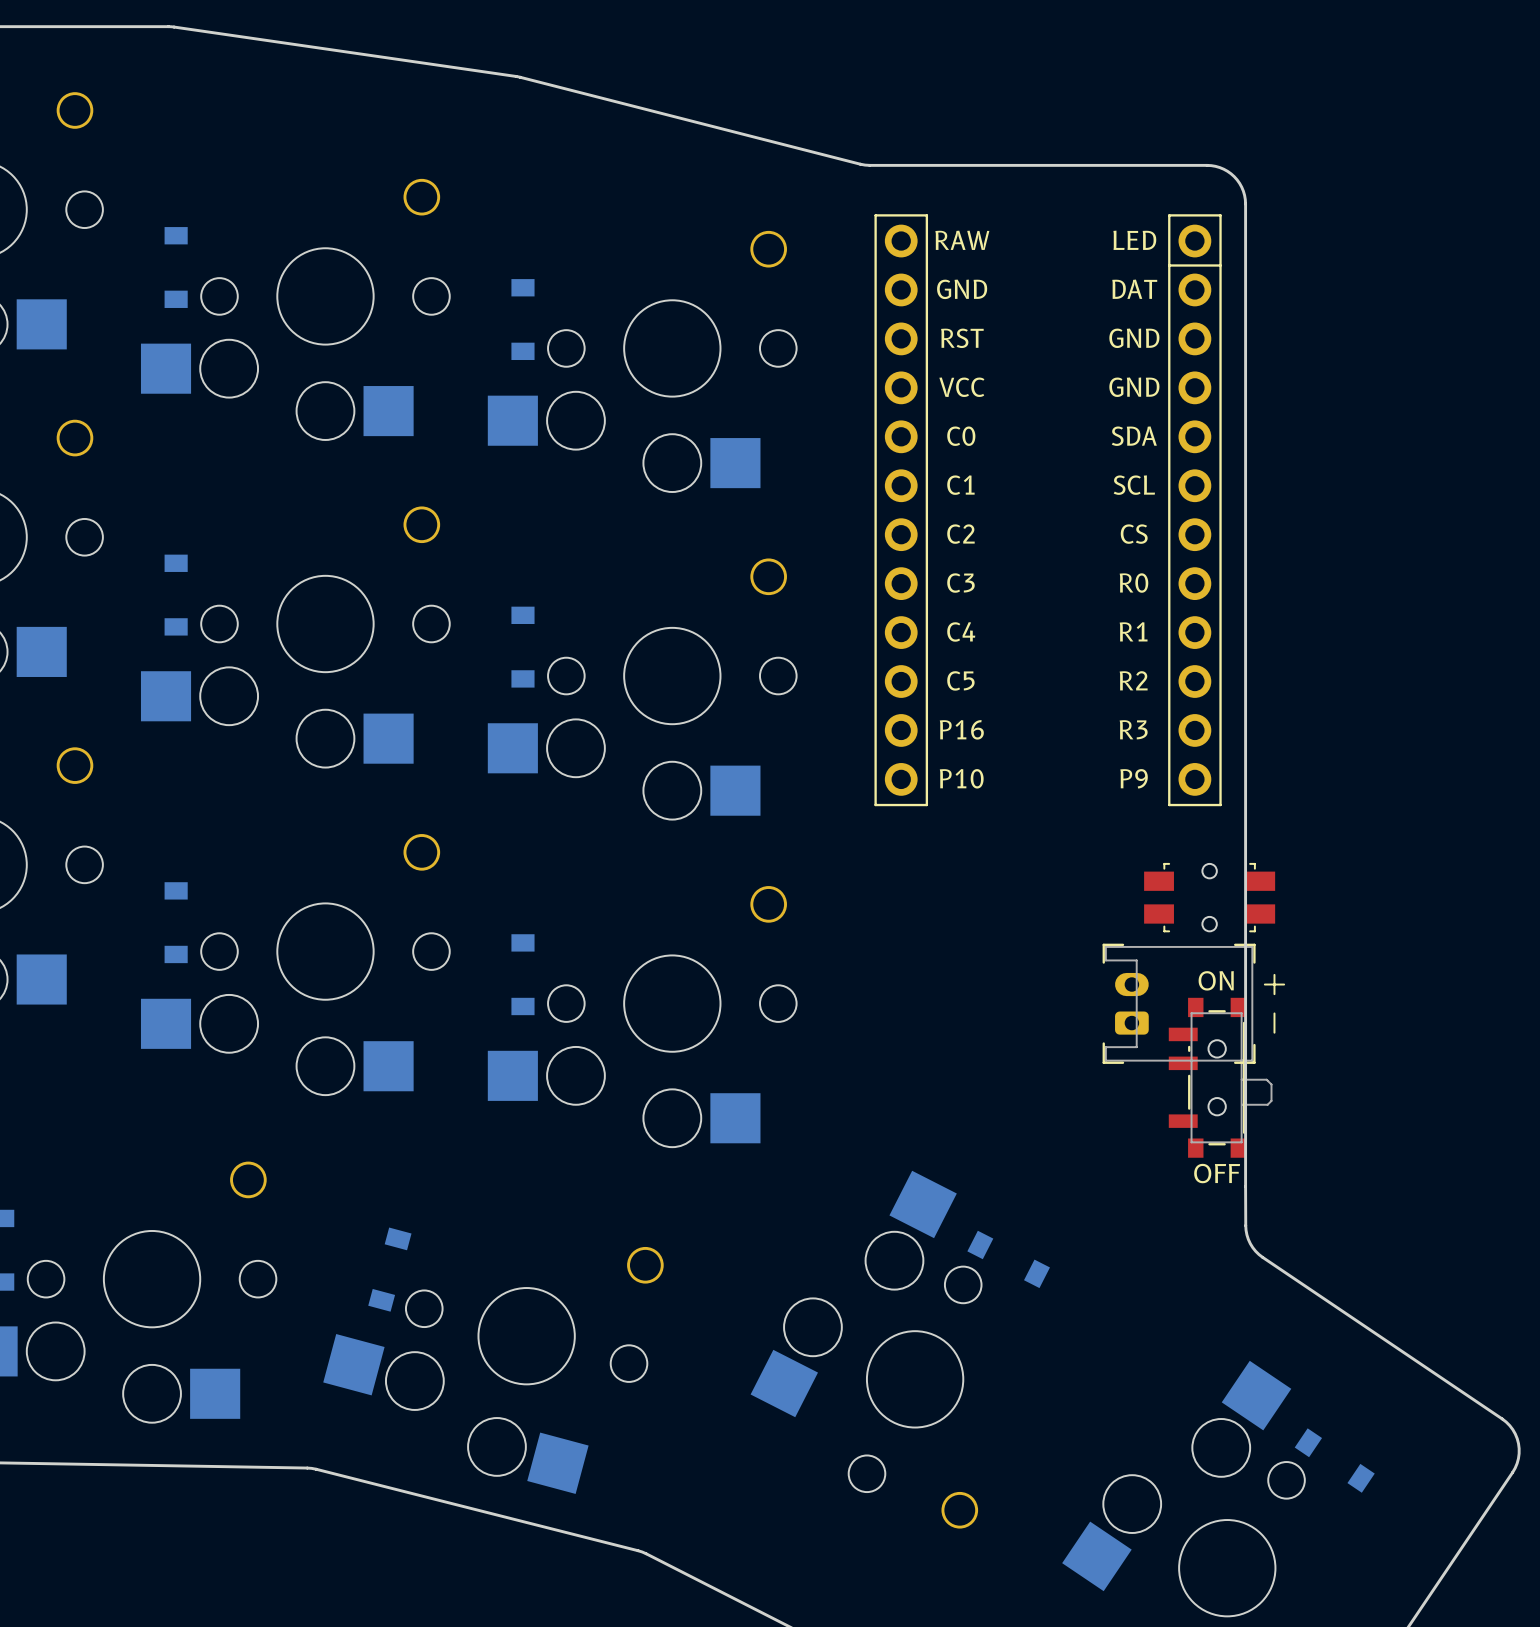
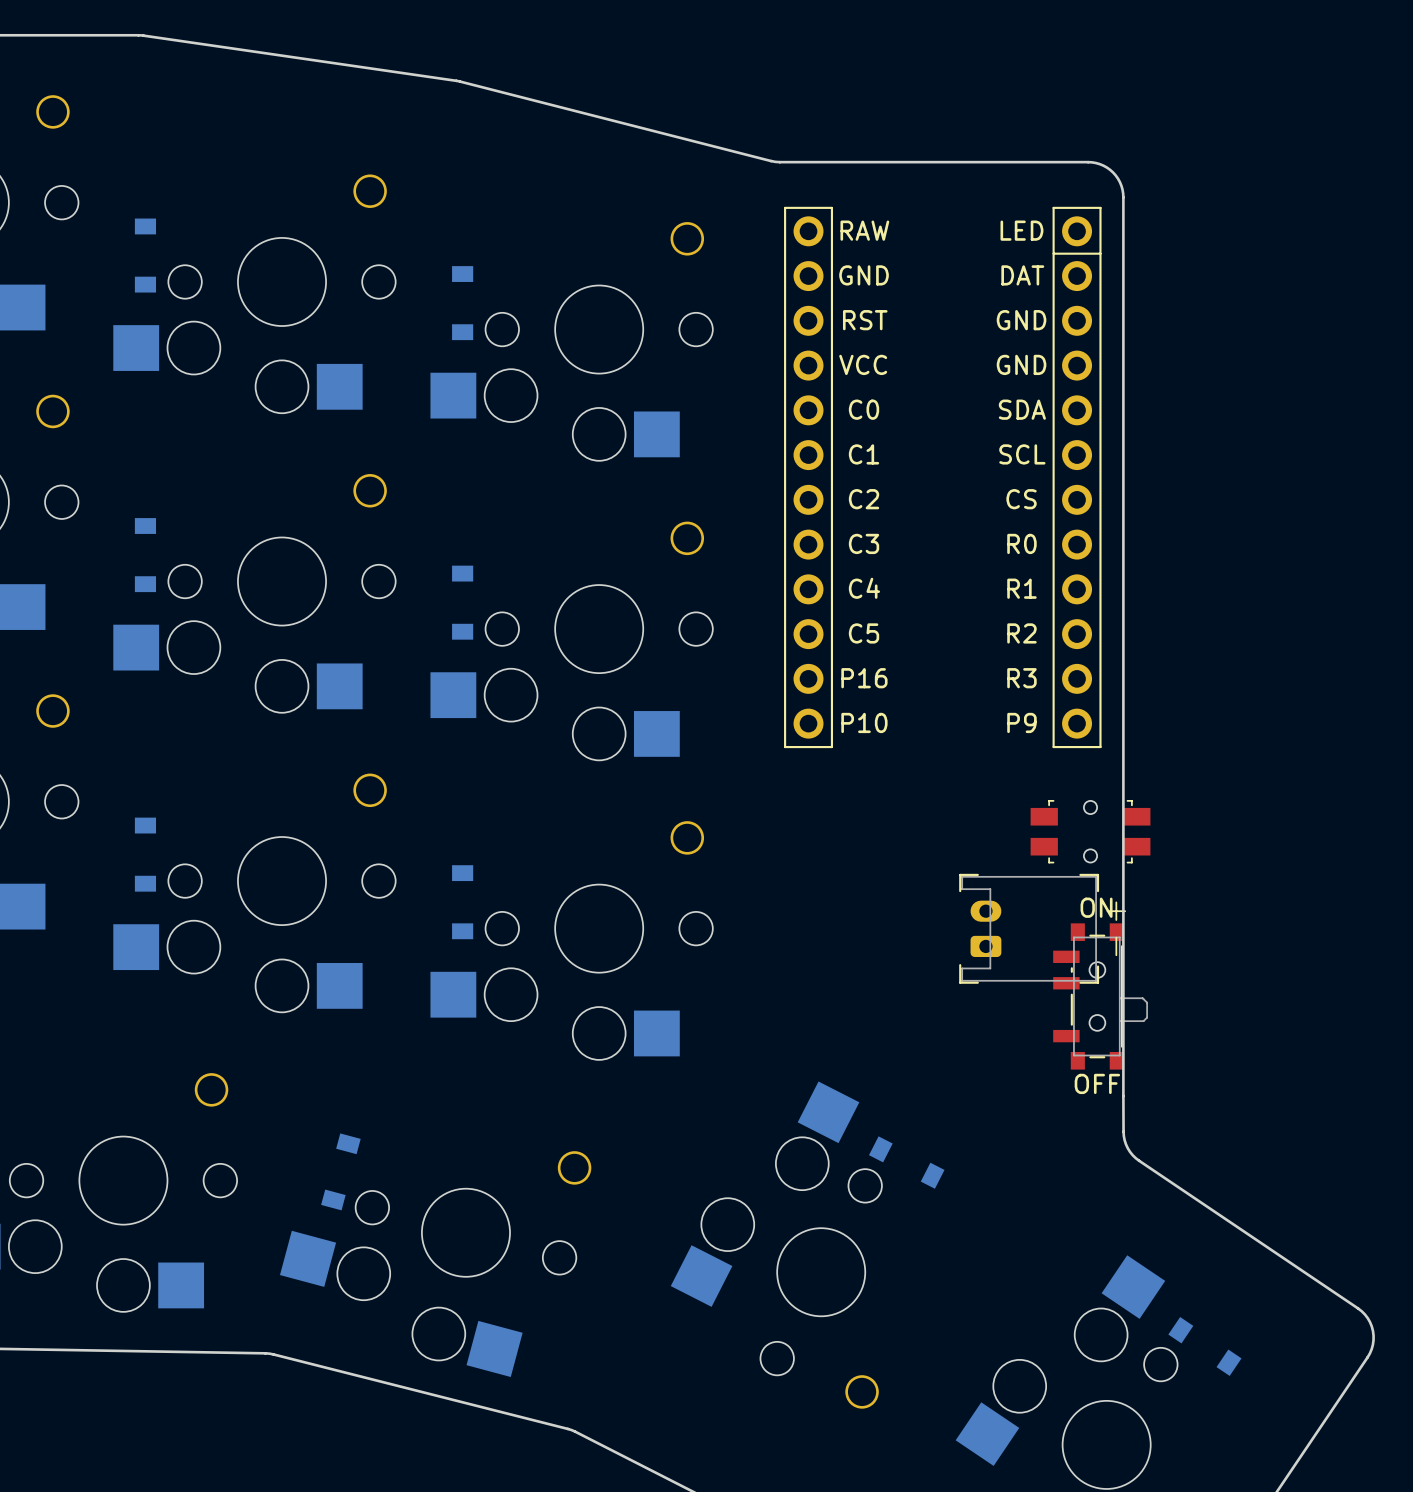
part position: (1193, 1003) -> (1042, 928)

